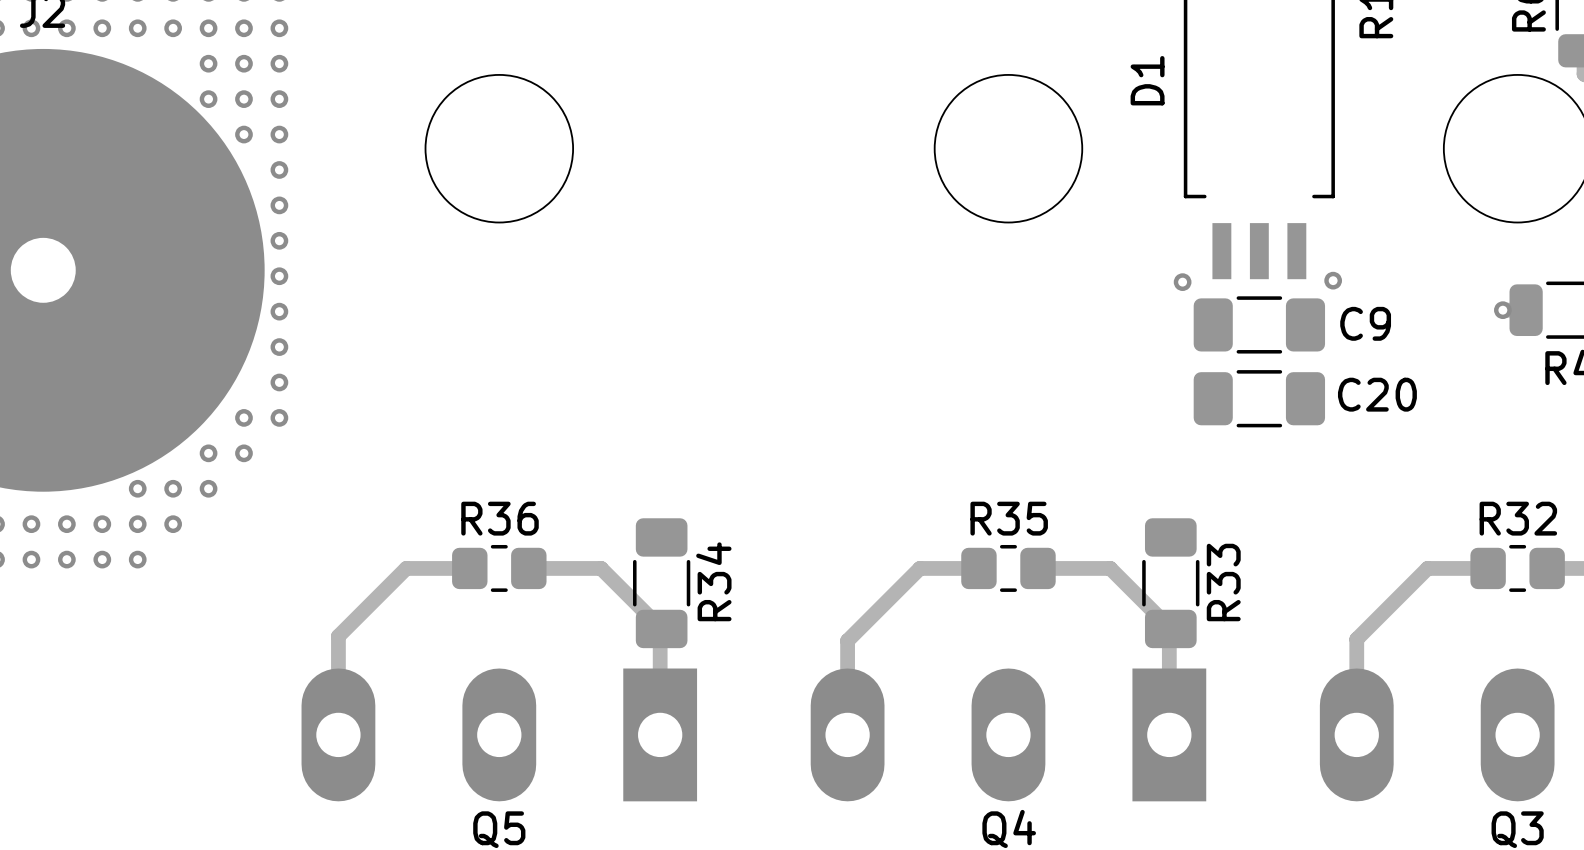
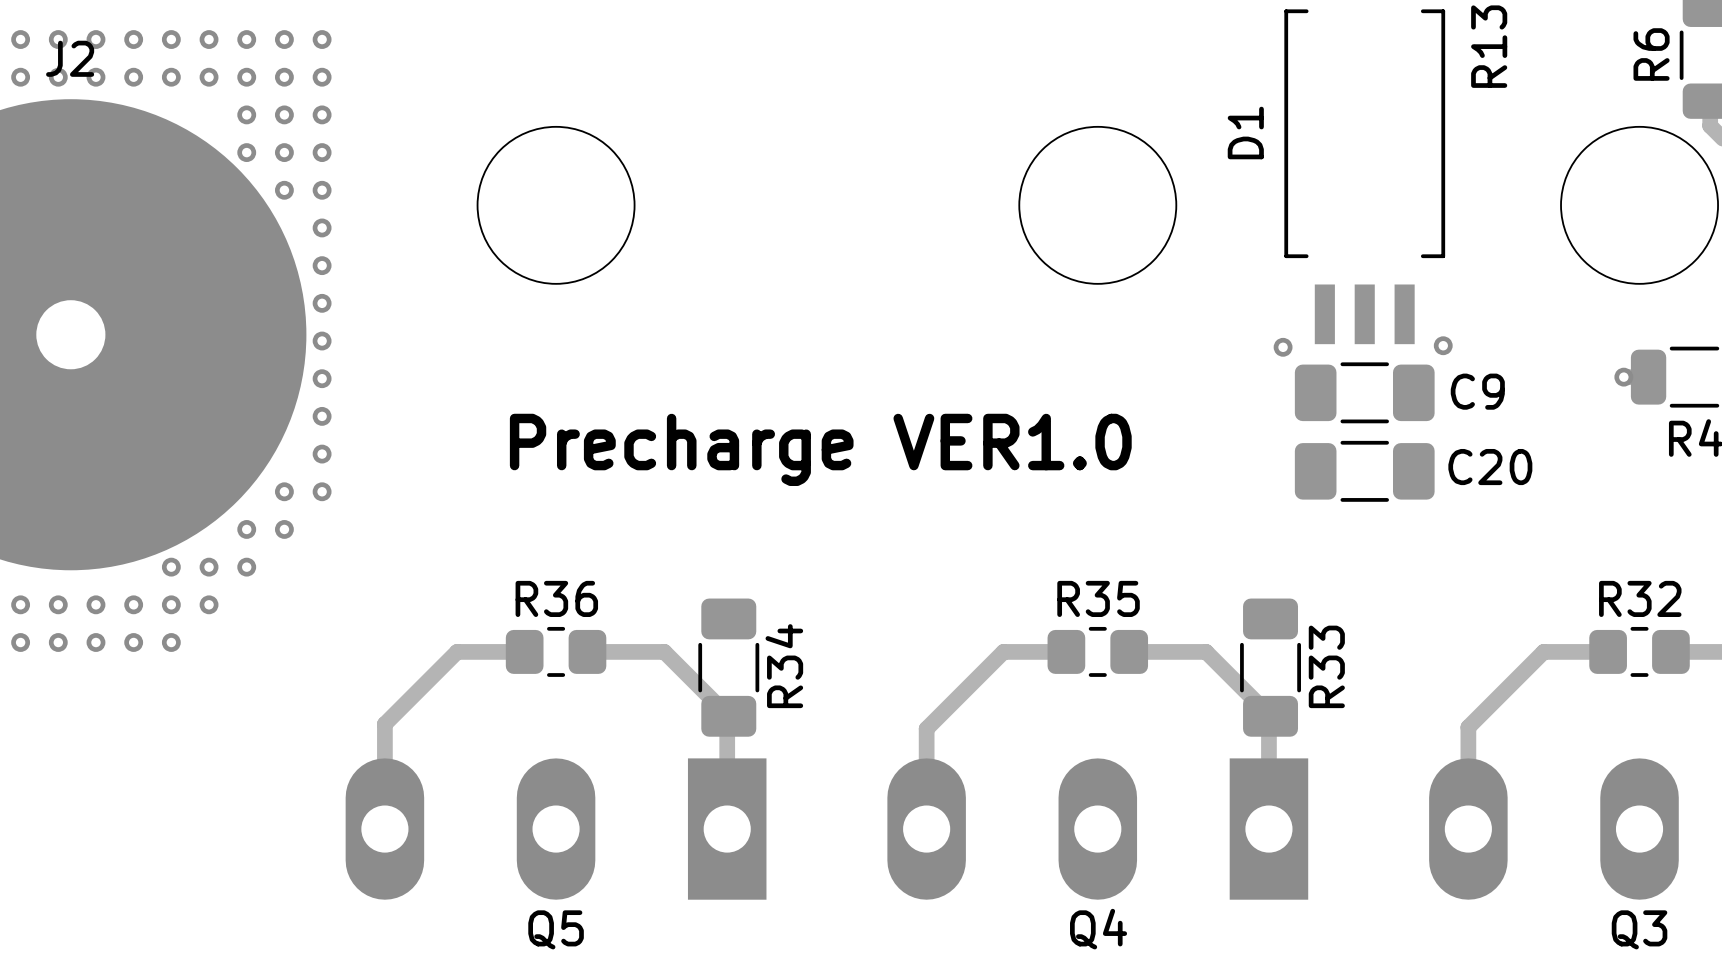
text: none -> Precharge VER1.0 (820, 449)

